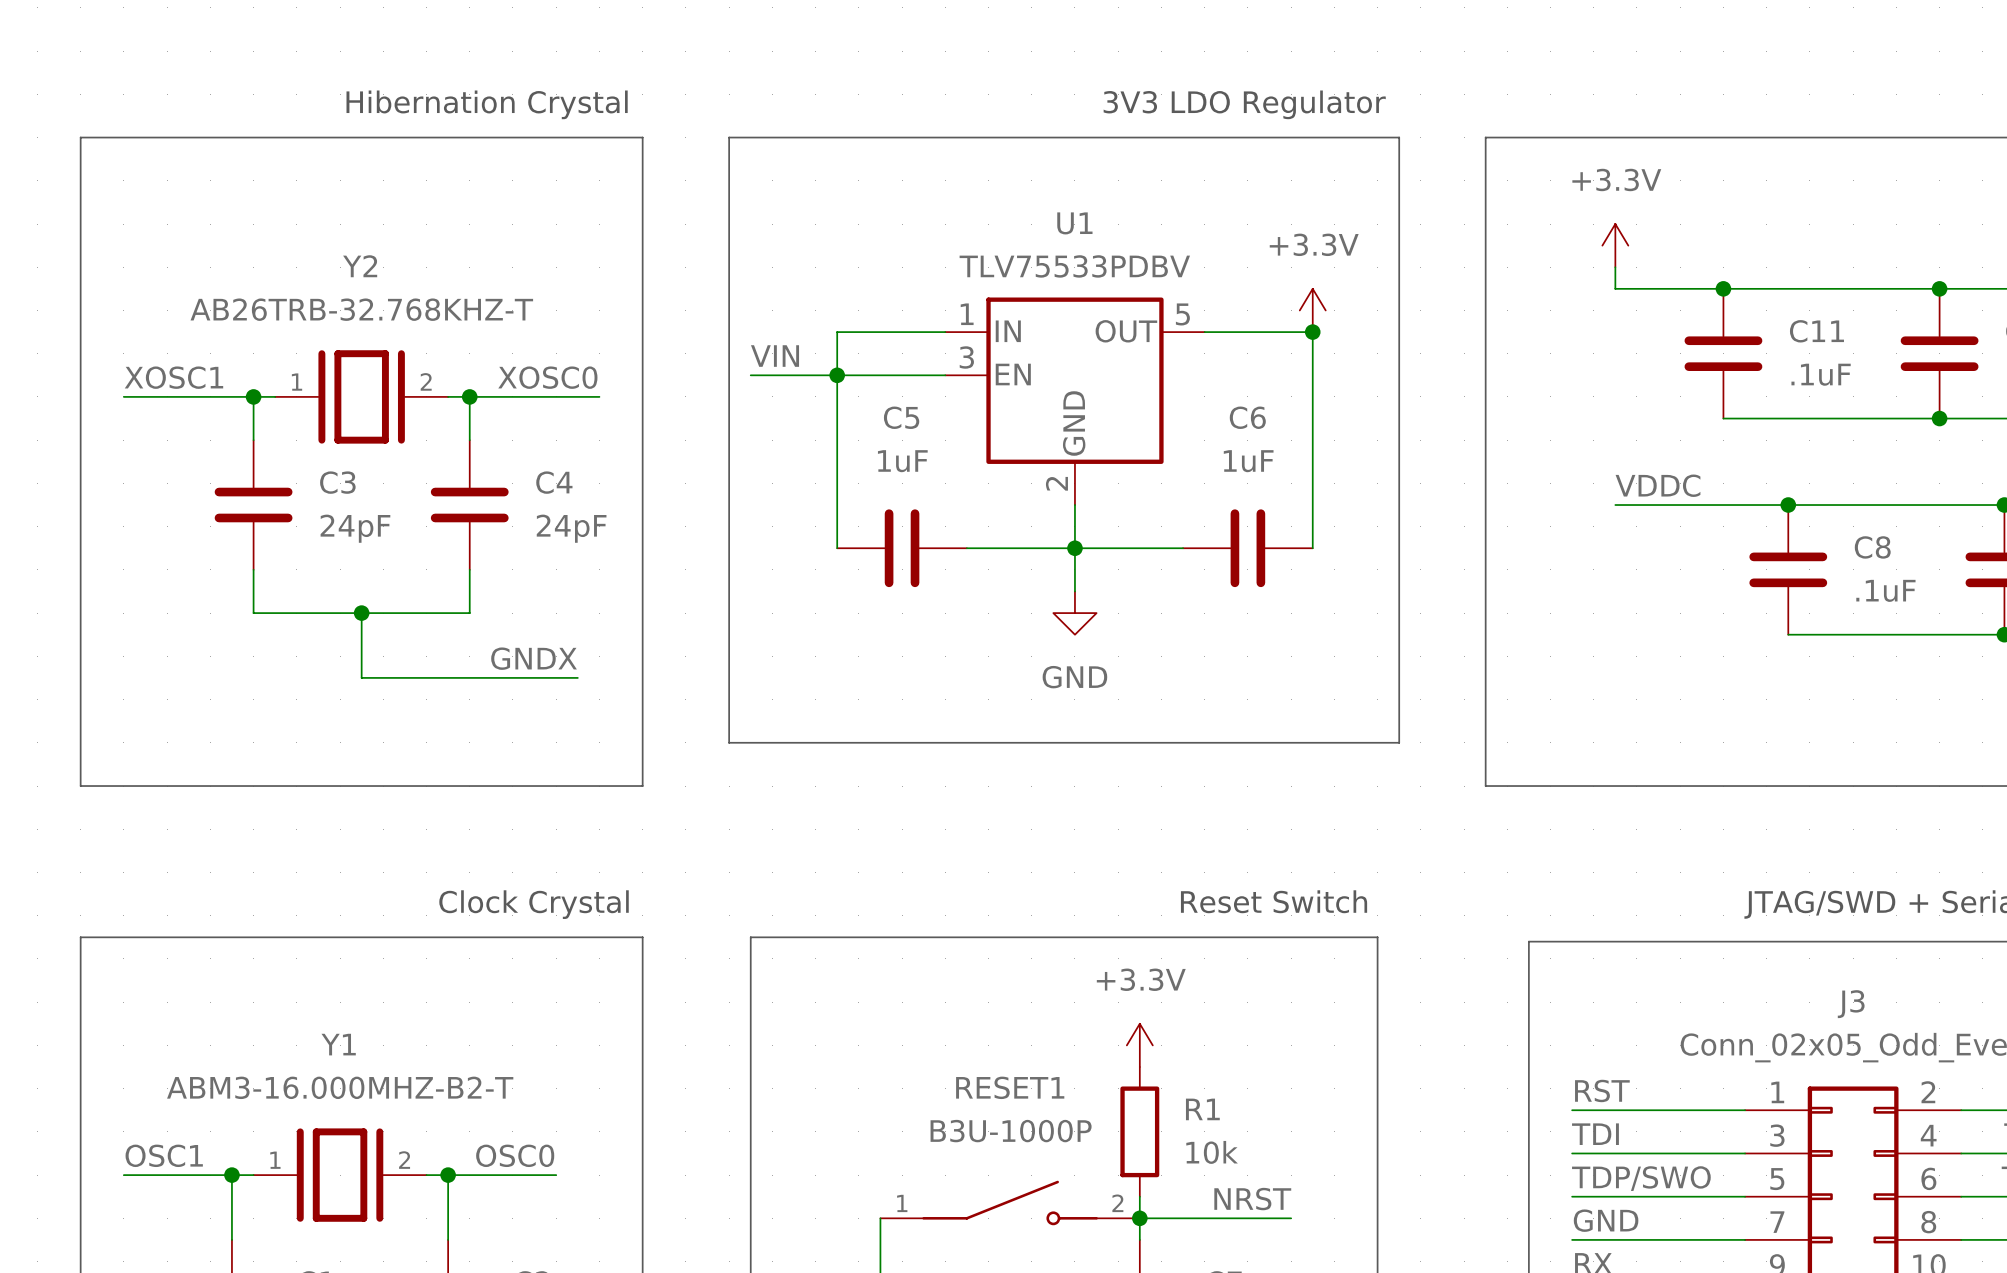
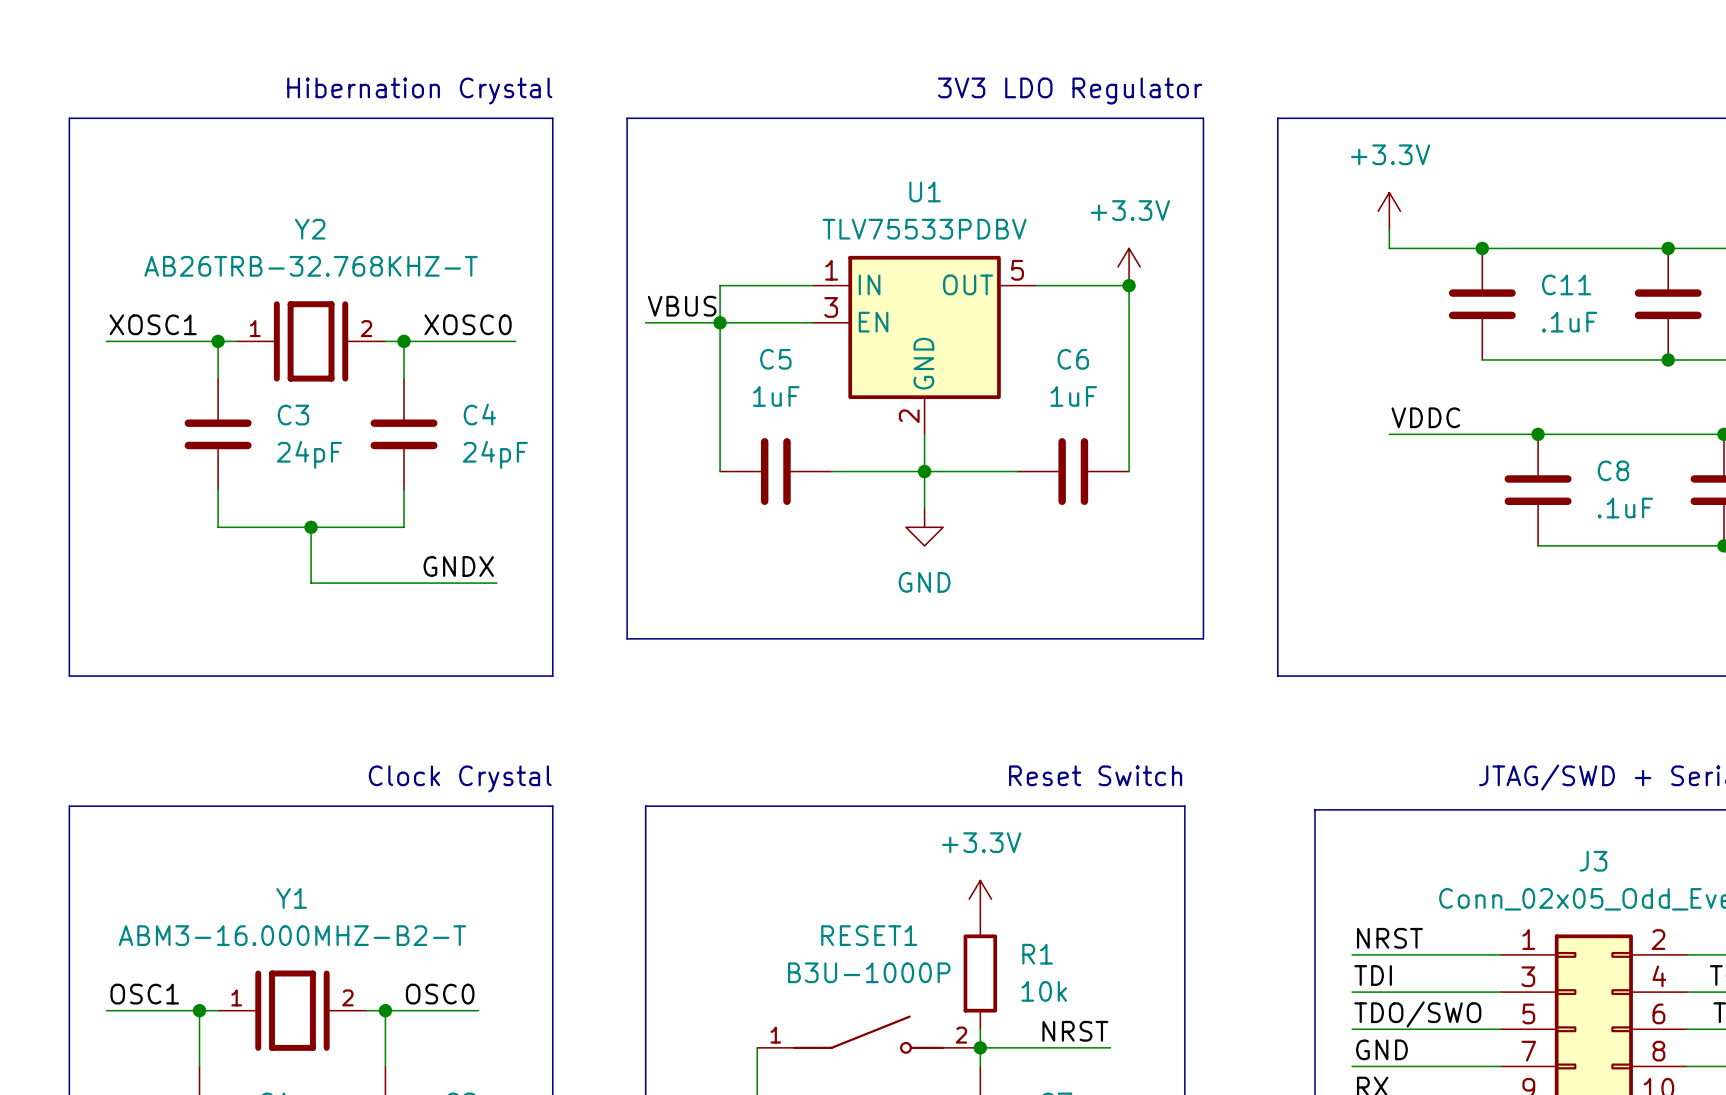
label: VIN (775, 356) -> VBUS (682, 306)
label: RST (1602, 1090) -> NRST (1389, 938)
label: TDP/SWO (1641, 1178) -> TDO/SWO (1417, 1014)

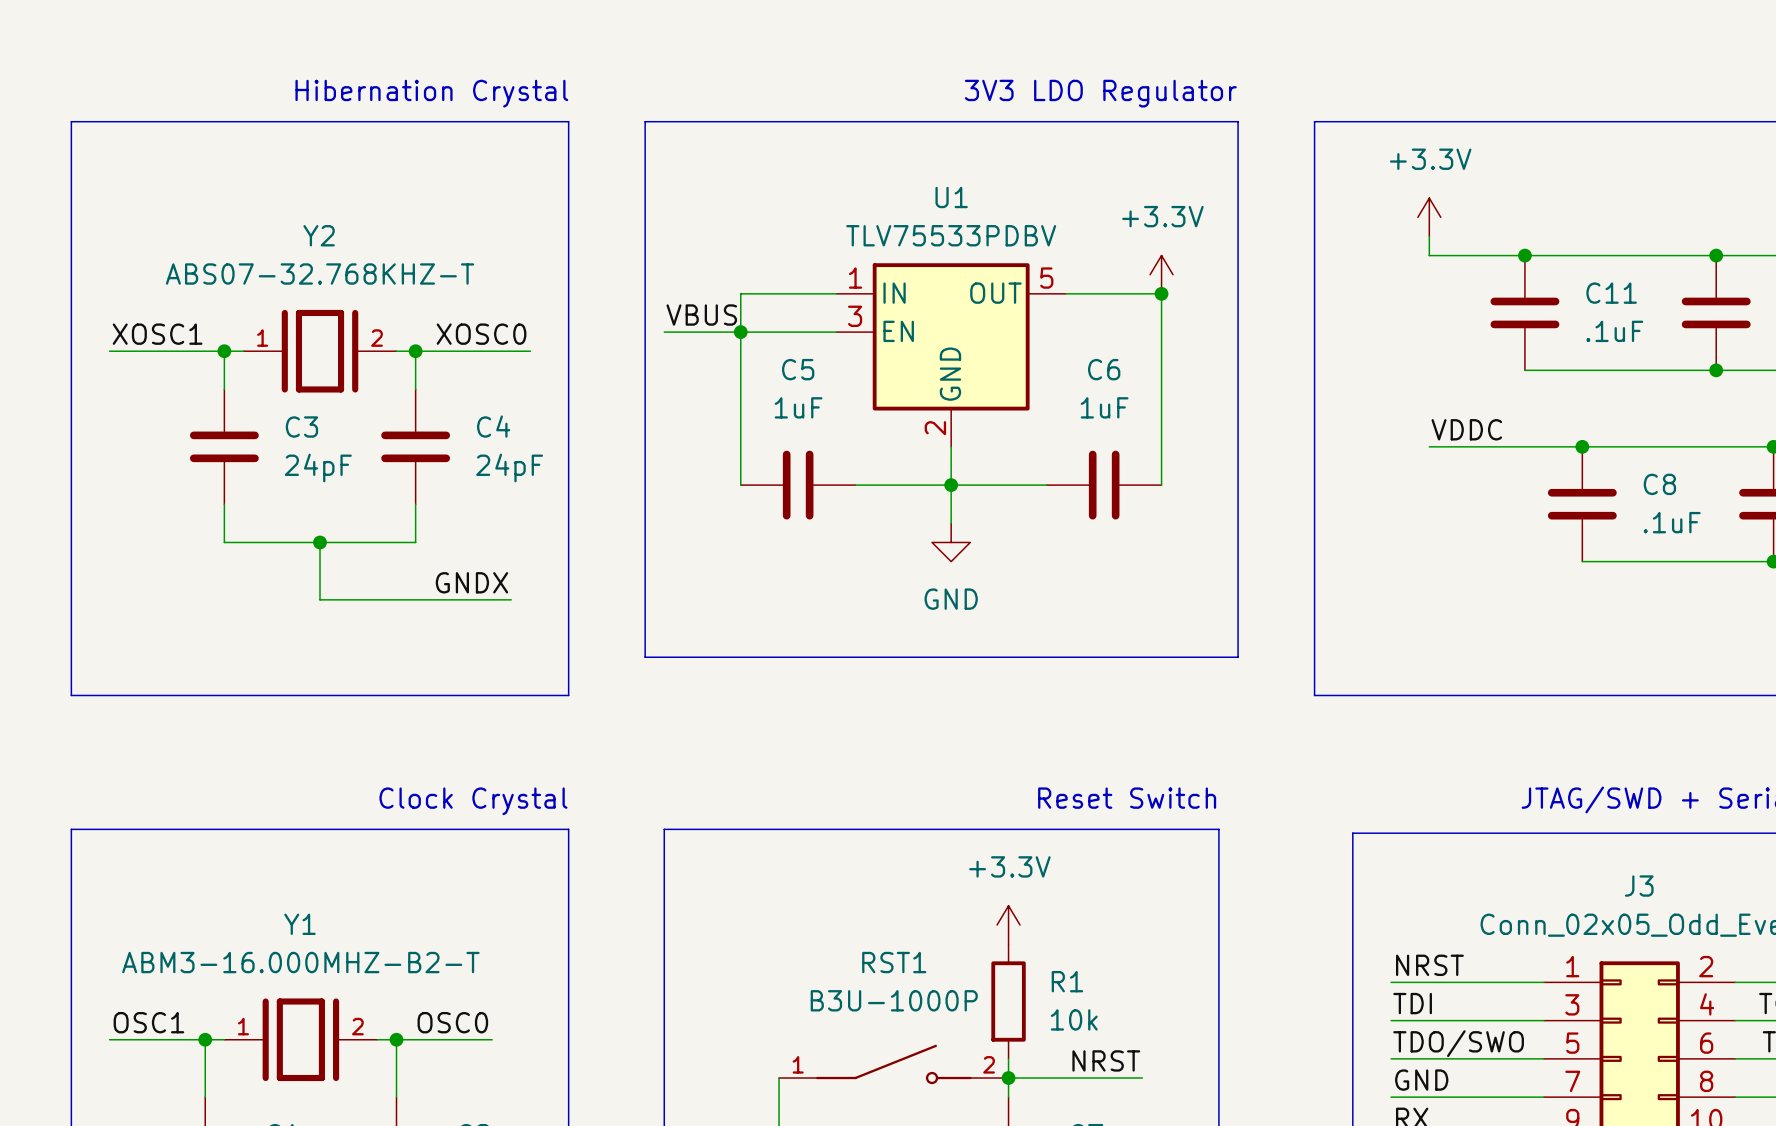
Y2 value: AB26TRB-32.768KHZ-T (311, 266) -> ABS07-32.768KHZ-T (320, 273)
RESET1 name: RESET1 (869, 935) -> RST1 (894, 962)

